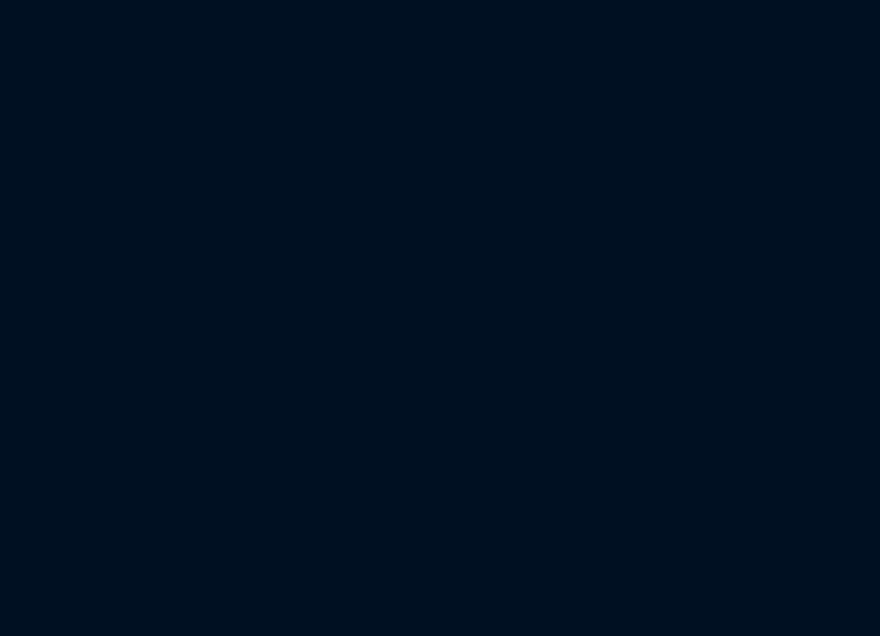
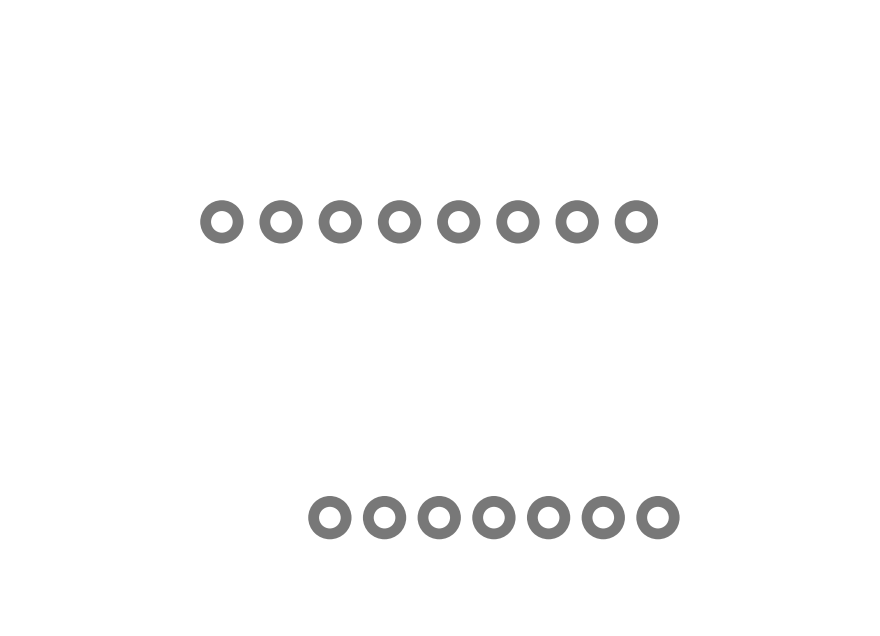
via: none -> (221, 221)
via: none -> (281, 221)
via: none -> (340, 221)
via: none -> (399, 221)
via: none -> (458, 221)
via: none -> (517, 221)
via: none -> (577, 221)
via: none -> (636, 221)
via: none -> (329, 517)
via: none -> (384, 517)
via: none -> (439, 517)
via: none -> (493, 517)
via: none -> (548, 517)
via: none -> (603, 517)
via: none -> (657, 517)

